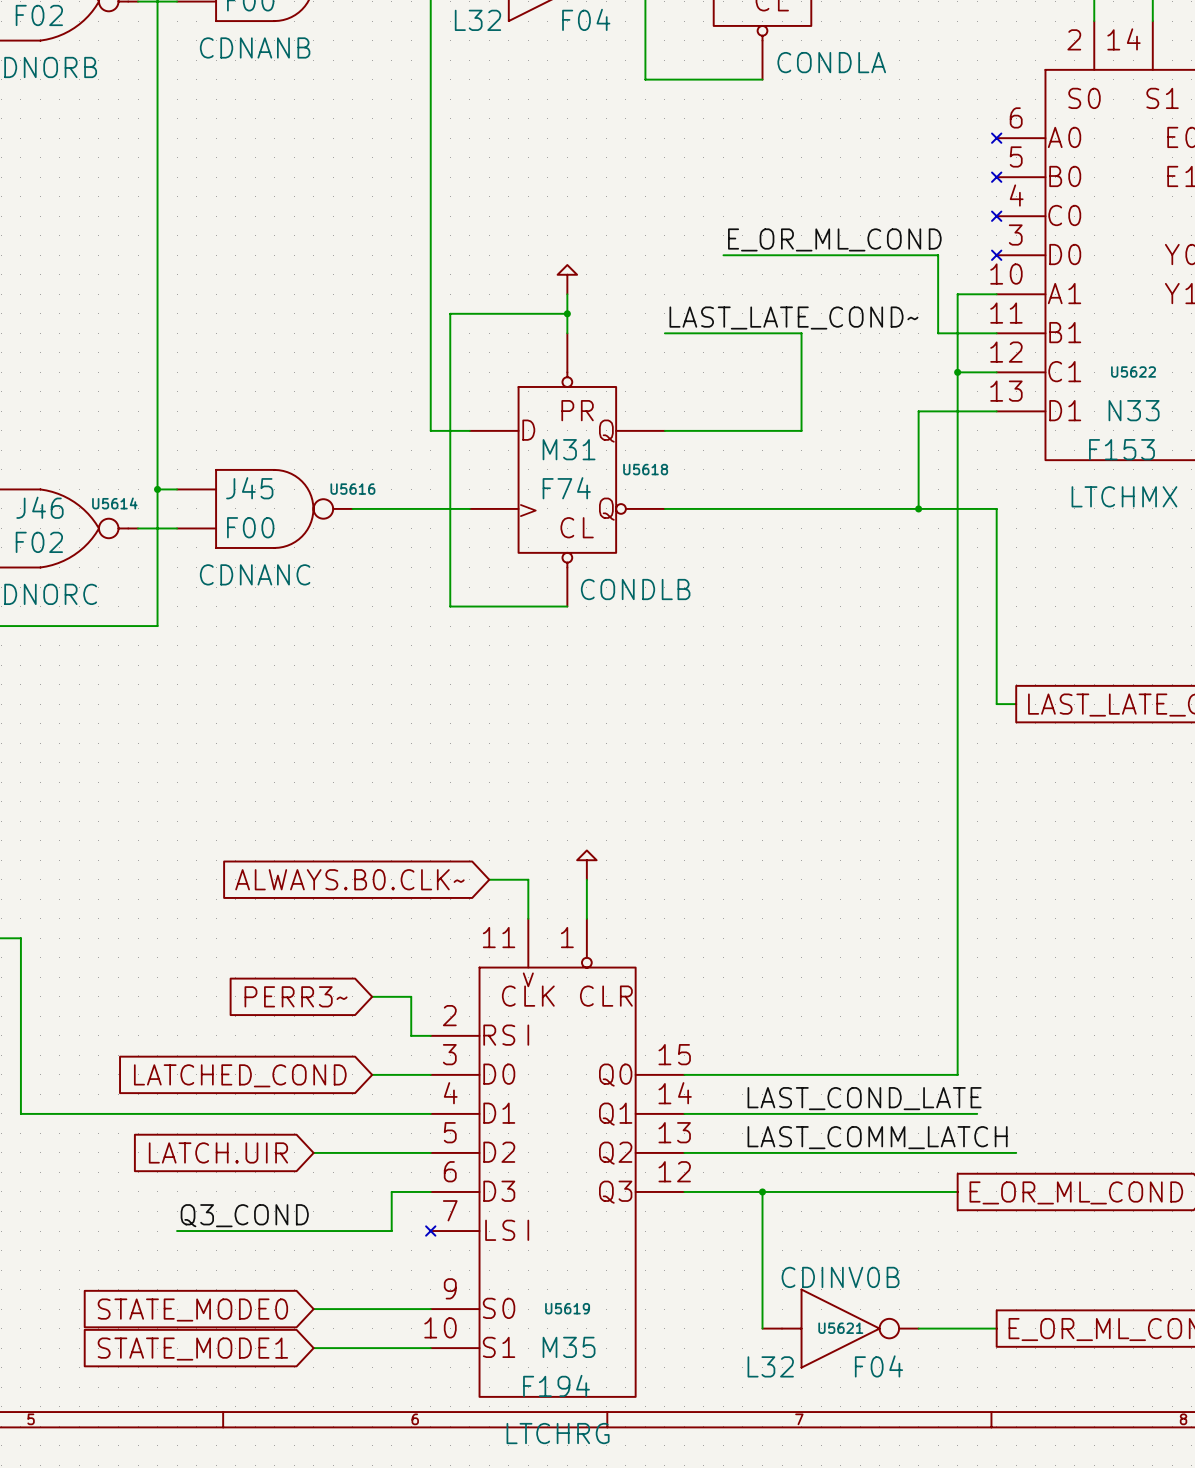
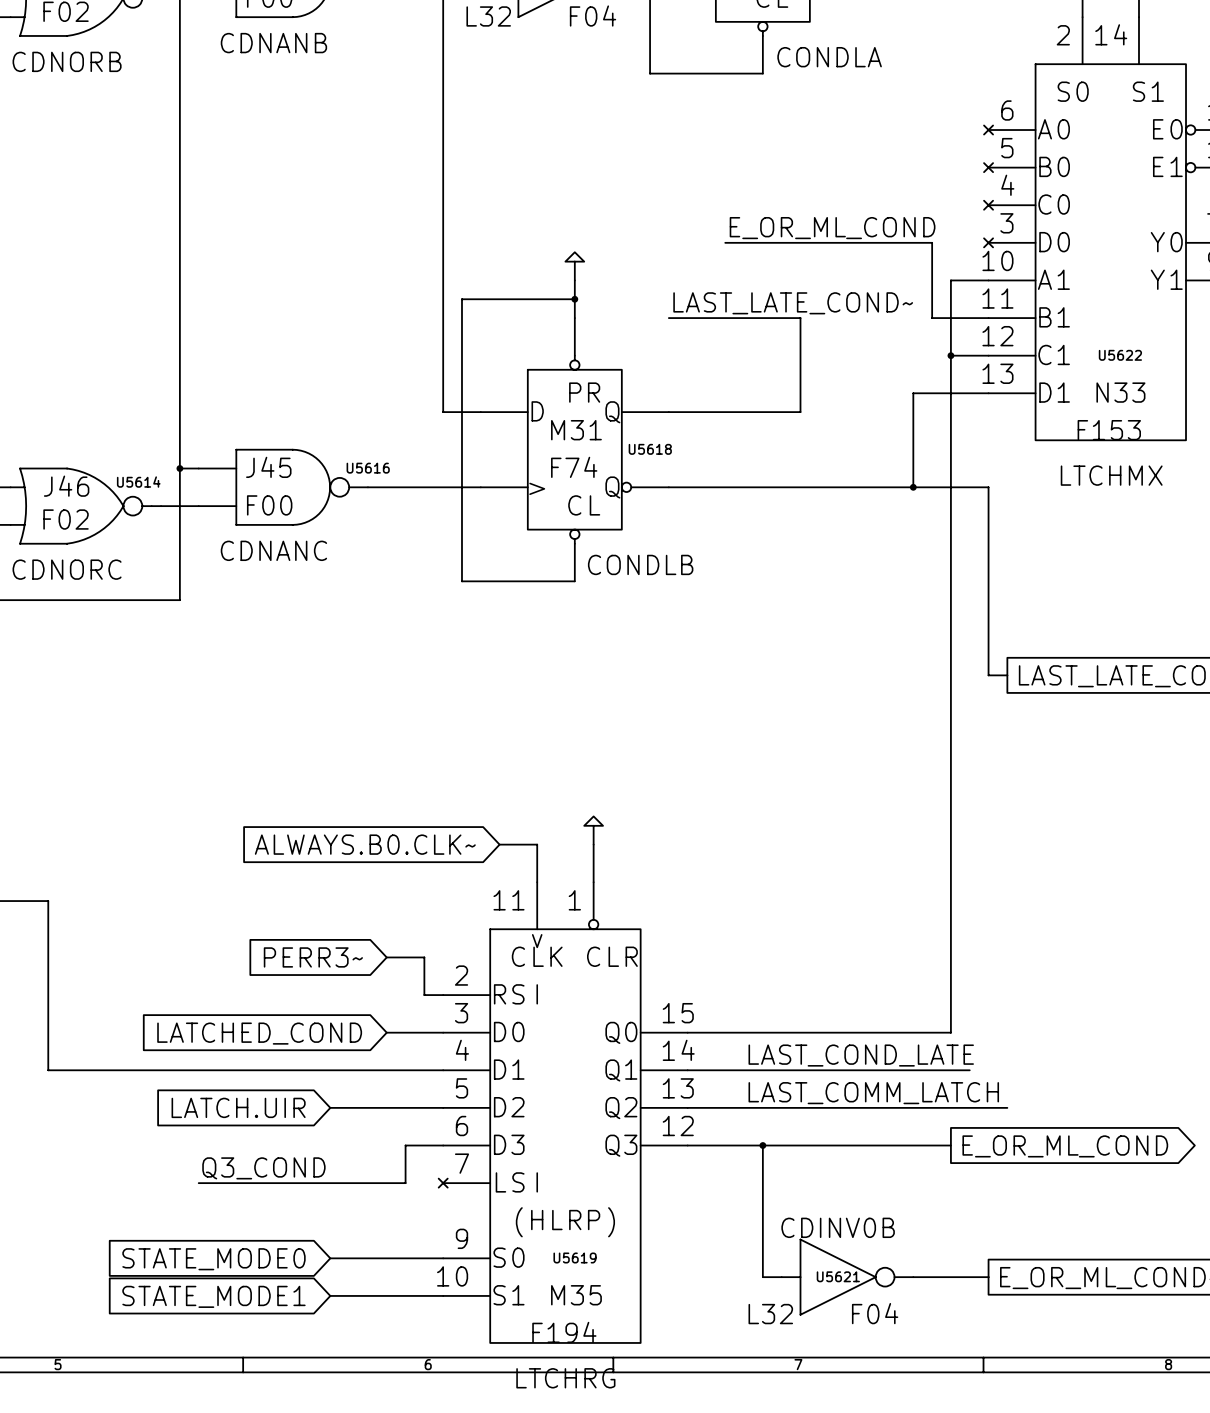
U5619 text: none -> H (537, 1220)
U5619 text: none -> L (557, 1220)
U5619 text: none -> R (575, 1220)
U5619 text: none -> P (594, 1220)
U5619 text: none -> ( (519, 1222)
U5619 text: none -> ) (611, 1222)

